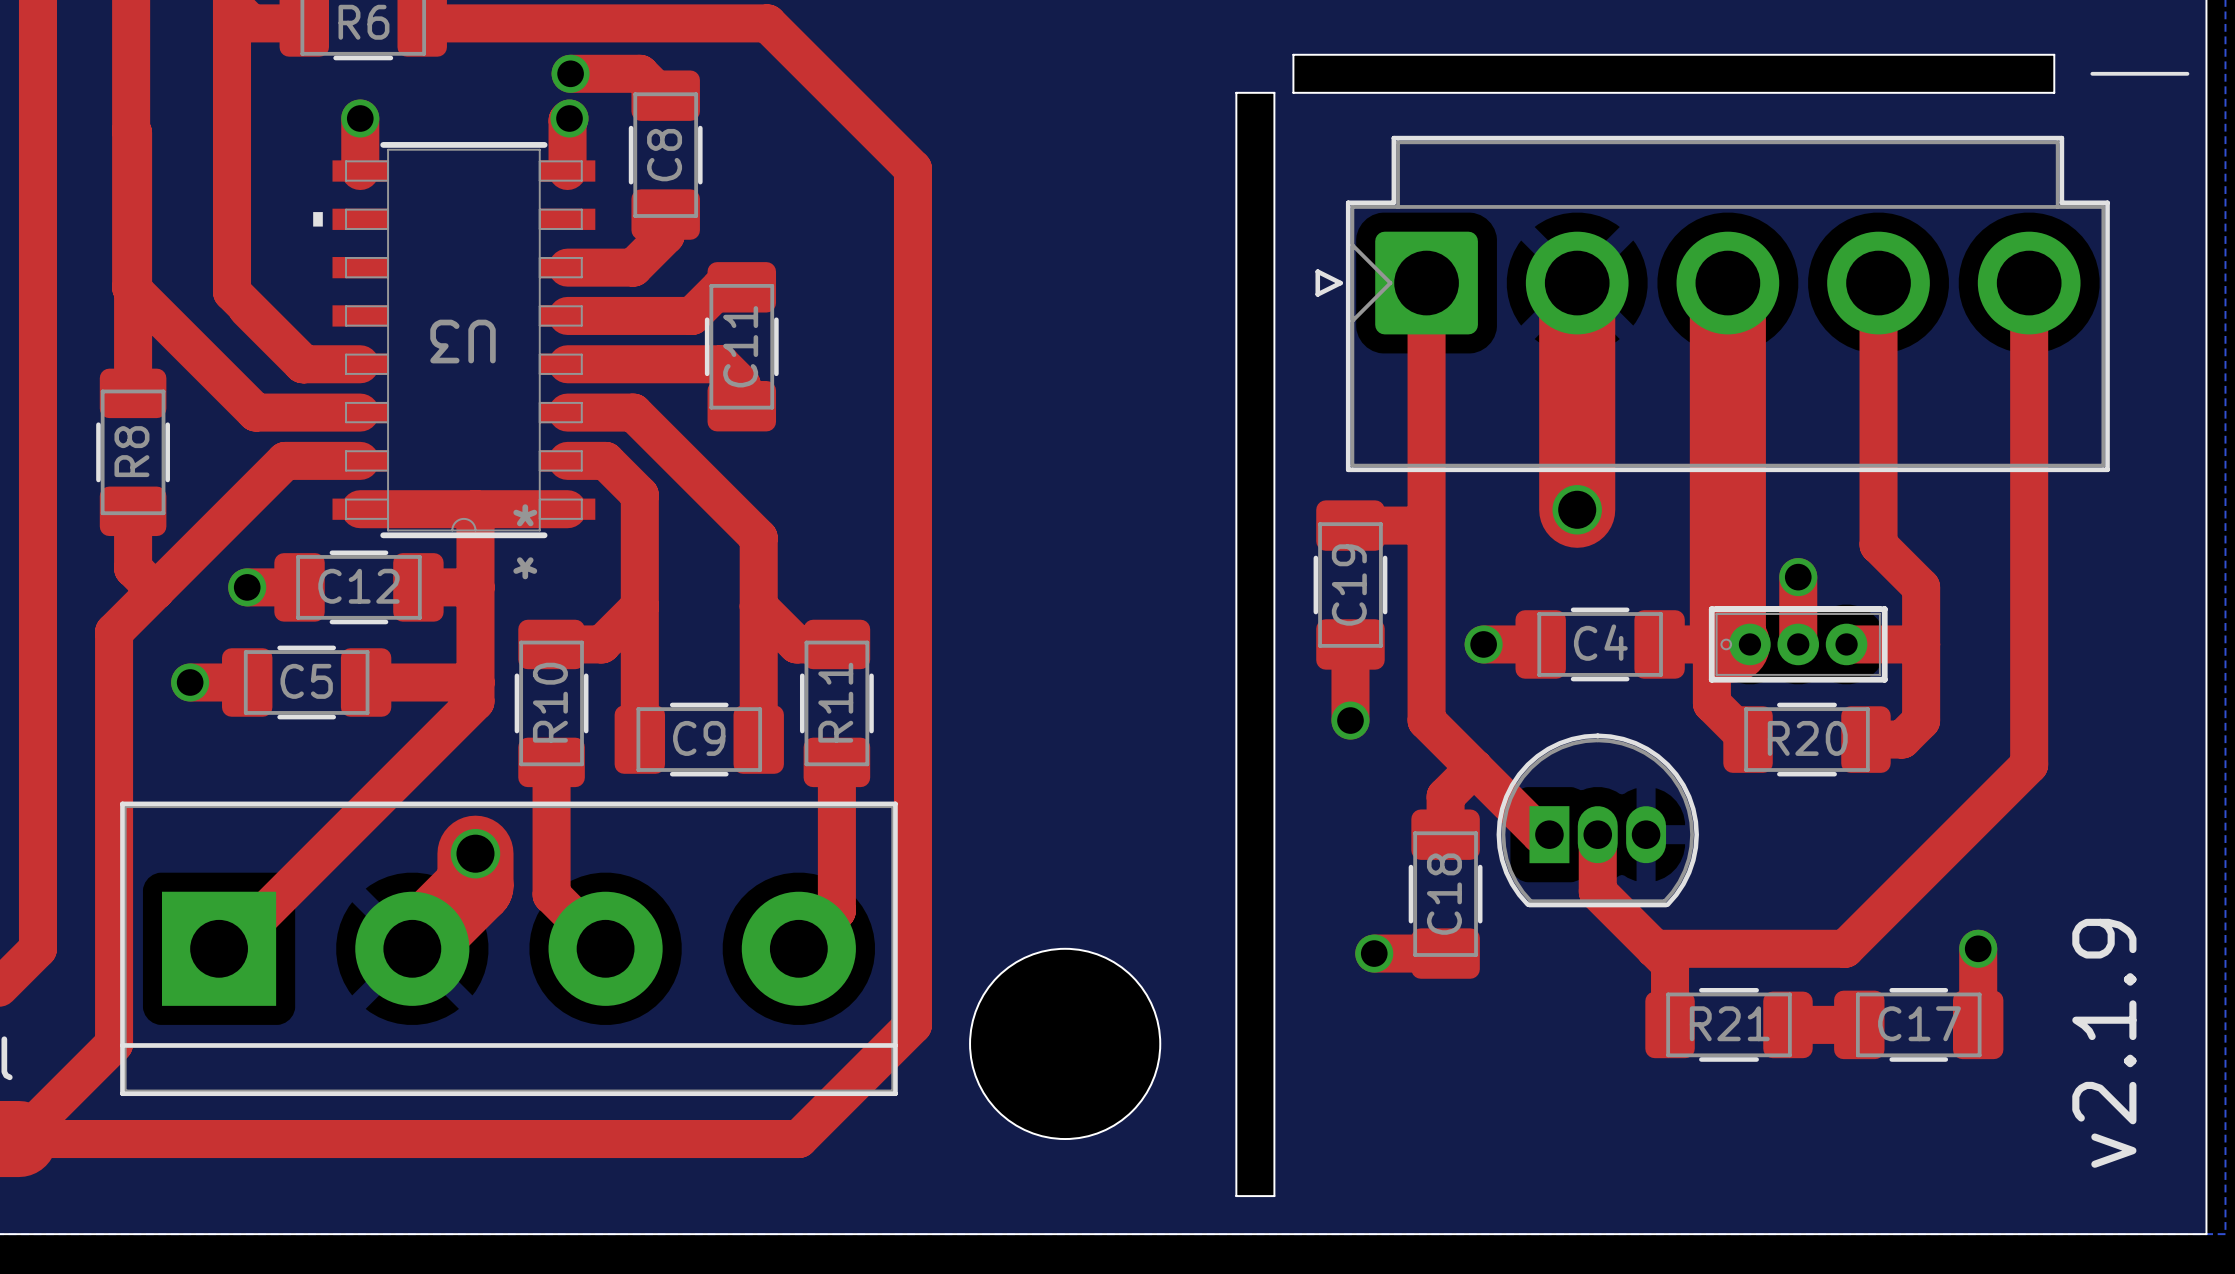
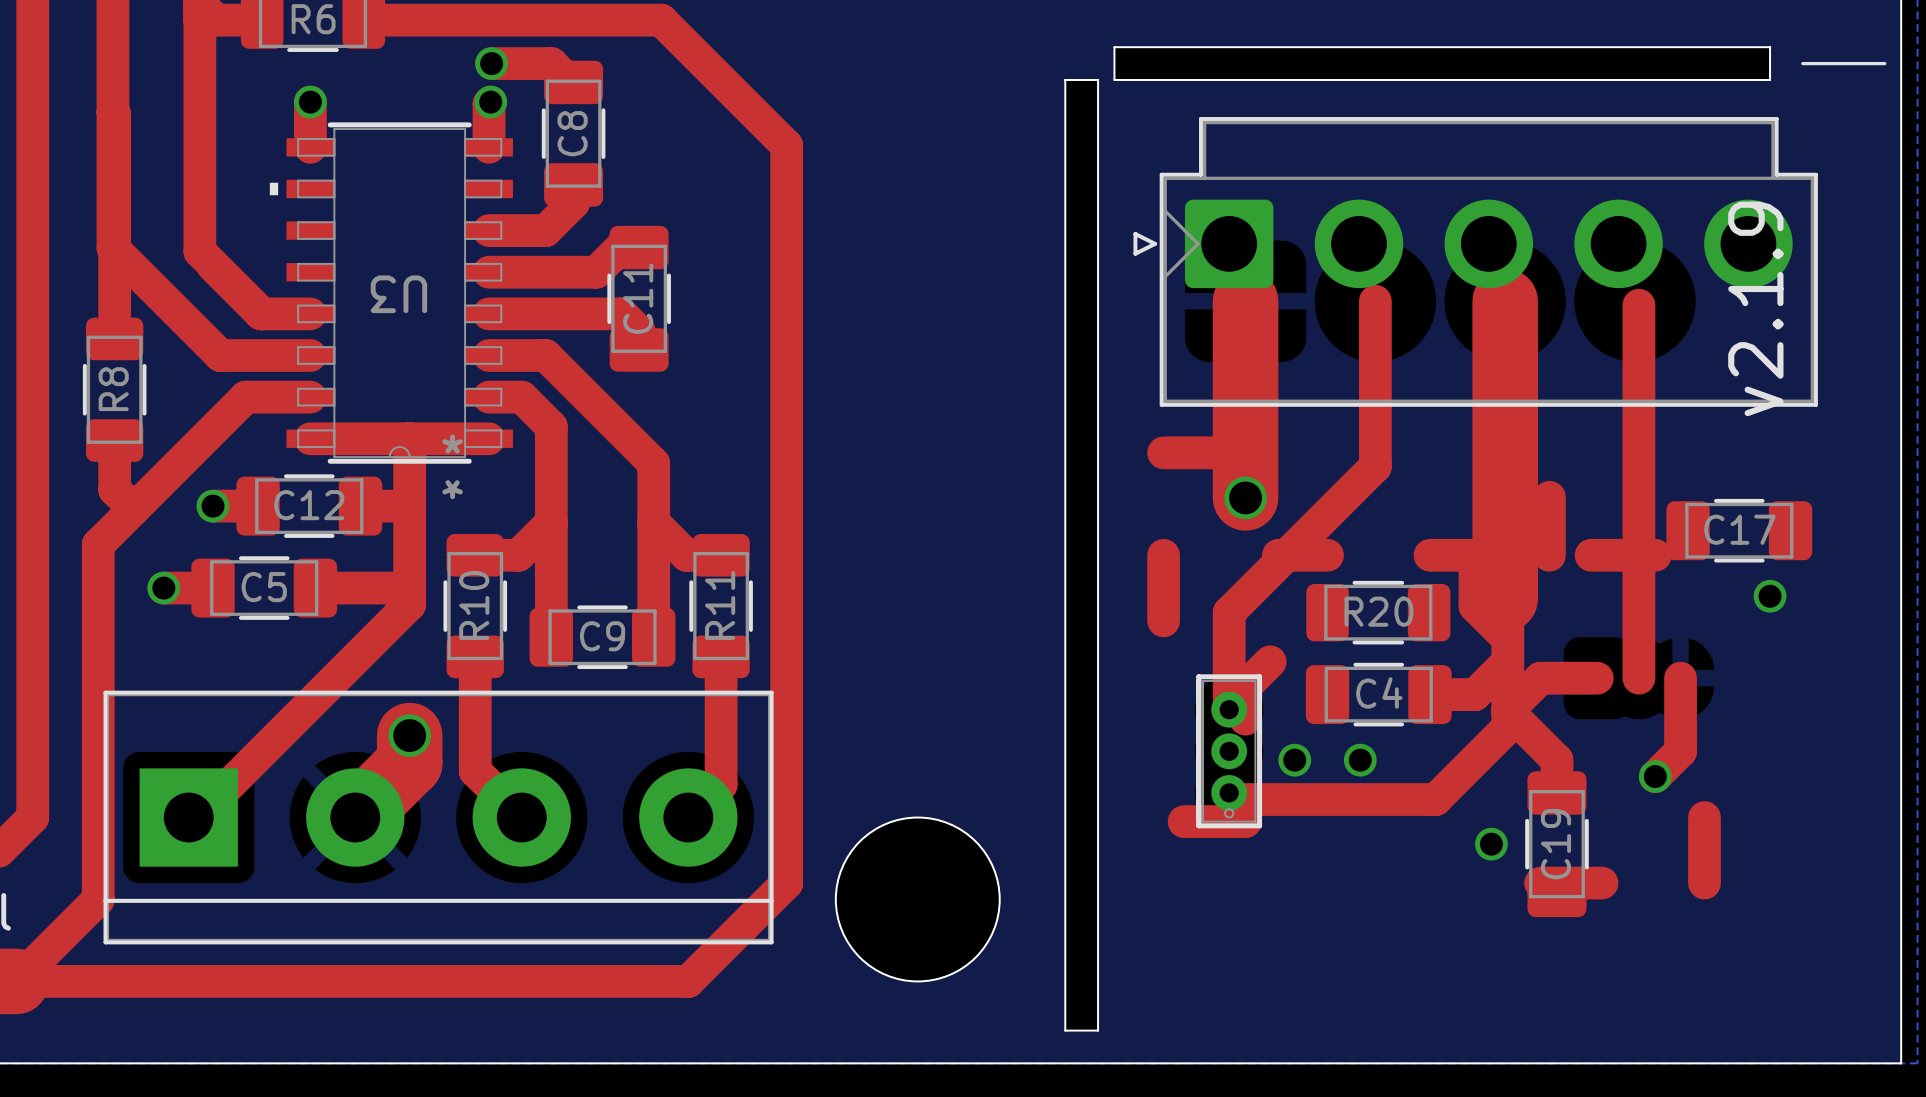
top track: (1426, 283) (1426, 711) -> (1375, 301) (1375, 466) (1229, 612)
top track: (1577, 283) (1577, 509) -> none
top track: (1727, 283) (1727, 640) (1731, 644) -> none
top track: (1878, 283) (1878, 544) (1921, 587) (1921, 720) (1902, 739) (1865, 739) -> none
top track: (2029, 283) (2029, 764) (1845, 948) (1654, 948) -> none
top track: none -> (1245, 301) (1245, 497)
top track: none -> (1505, 301) (1505, 598)
top track: none -> (1638, 305) (1638, 678)
via position: (1577, 509) -> (1245, 497)
via: (1798, 577) -> none
C19 position: (1350, 585) -> (1556, 844)
top track: none -> (1505, 547) (1507, 549) (1507, 727) (1435, 799) (1235, 799) (1229, 792)
via: (1483, 644) -> none
C4 position: (1600, 644) -> (1378, 694)
part rotation: 0° (1798, 644) -> 90° counterclockwise (1229, 751)
part position: (1798, 644) -> (1229, 751)
via: none -> (1770, 596)
via: (1350, 720) -> none
top track: (1426, 720) (1540, 834) (1549, 834) -> (1229, 620) (1229, 709)
R20 position: (1807, 739) -> (1378, 612)
top track: none -> (1507, 661) (1475, 694) (1429, 694)
top track: none -> (1597, 678) (1540, 678) (1507, 710) (1556, 760) (1556, 792)
top track: none -> (1680, 678) (1680, 751) (1655, 776)
part: (1597, 820) -> none
top track: (1597, 834) (1597, 891) (1670, 964) (1670, 1024) -> none
via: none -> (1294, 760)
via: none -> (1360, 760)
C18: (1445, 894) -> none
via position: (1978, 948) -> (1655, 776)
via: (1374, 953) -> none
via: none -> (1491, 844)
R21: (1729, 1024) -> none
C17 position: (1918, 1024) -> (1739, 530)
text position: v2.1.9 (2104, 1043) -> v2.1.9 (1755, 308)

